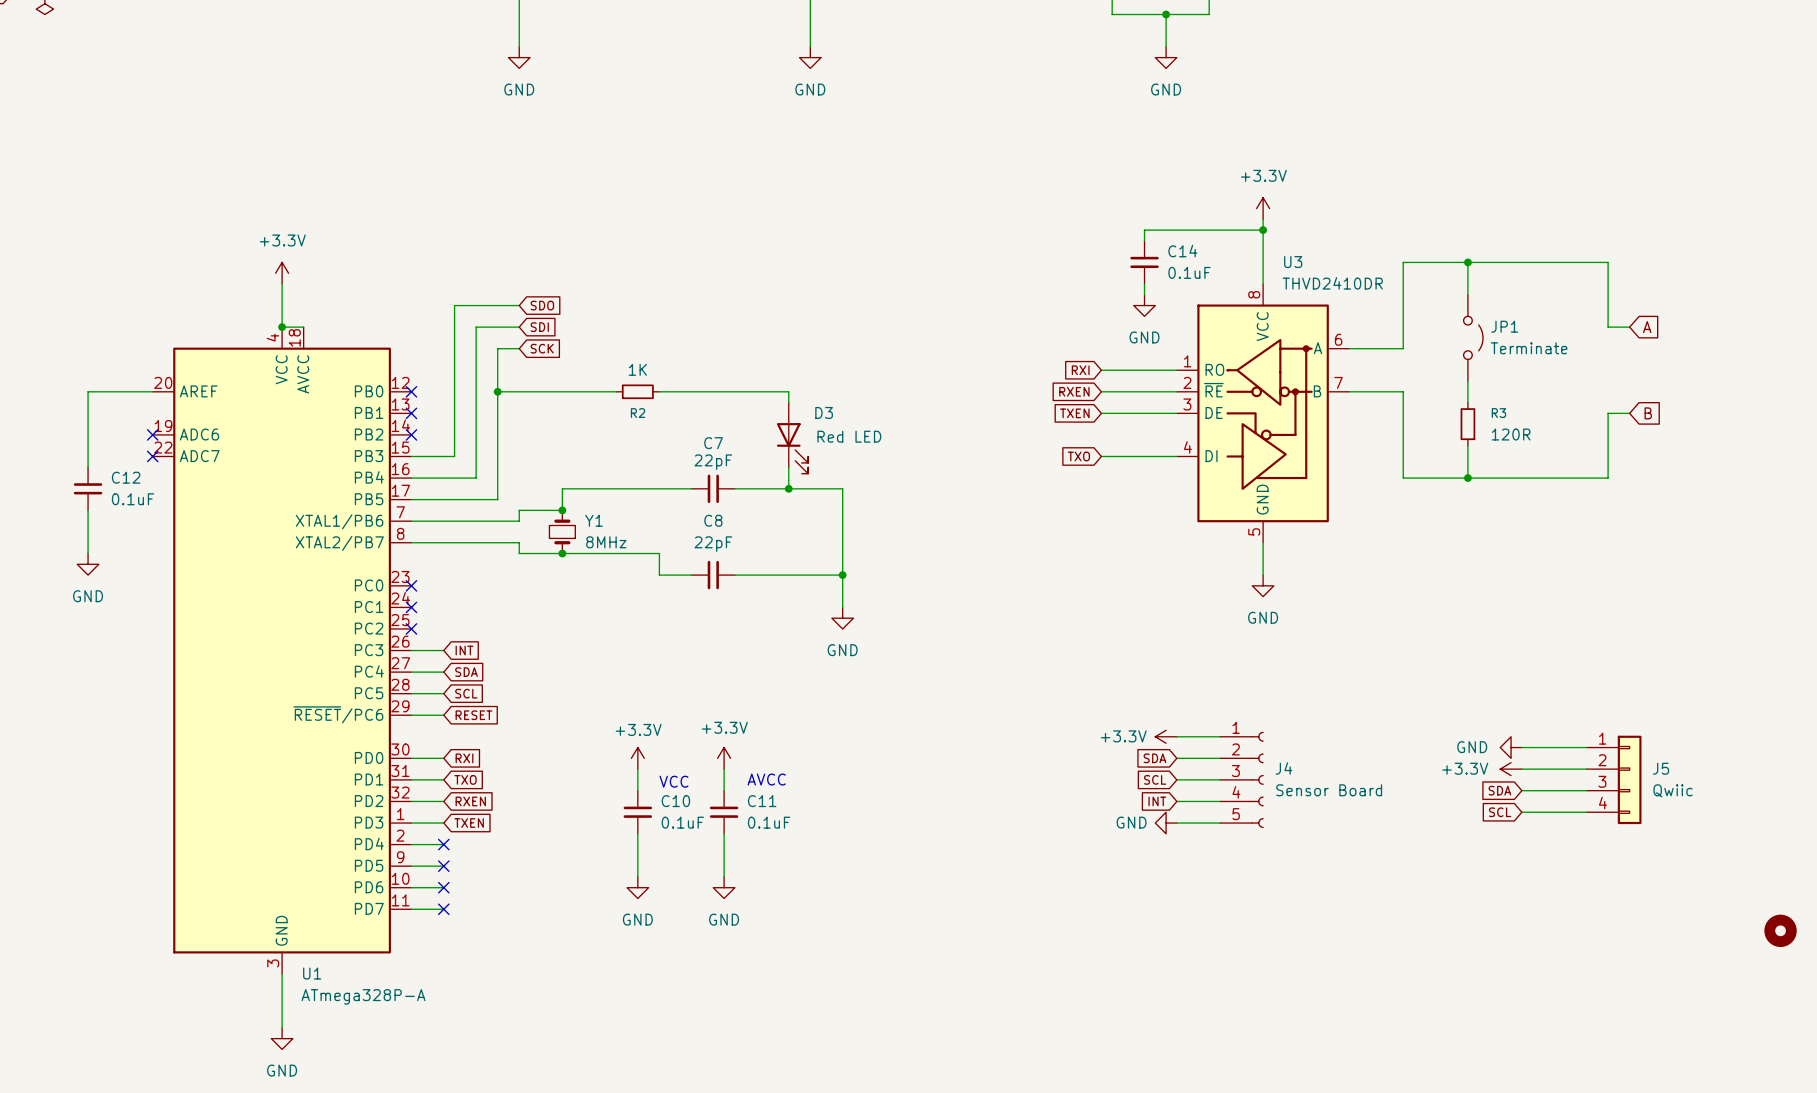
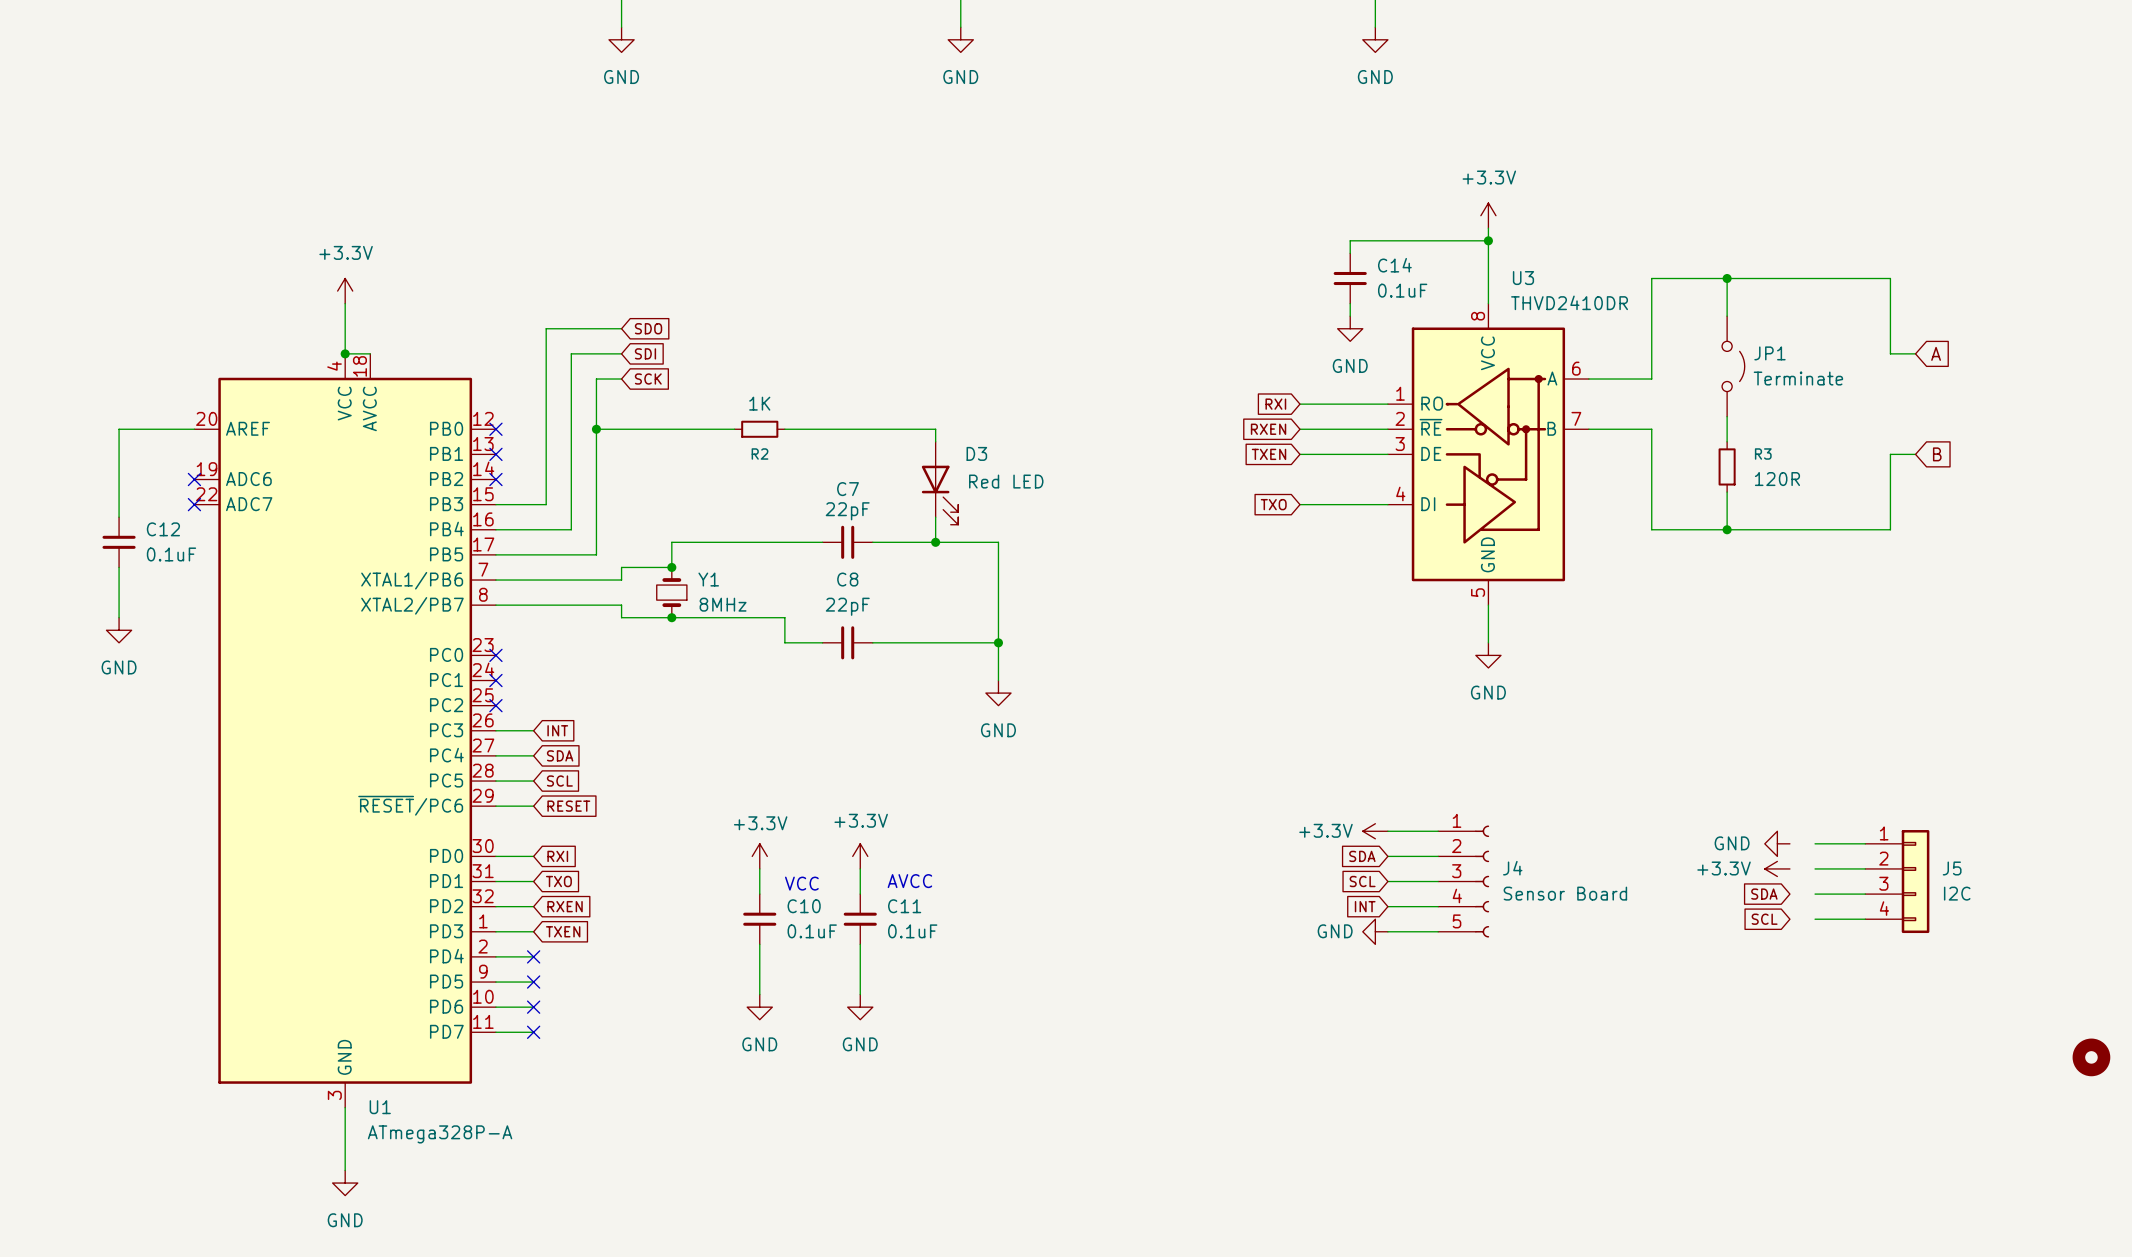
wire: (1521, 747) (1543, 747) -> none
wire: (1521, 769) (1543, 769) -> none
wire: (1521, 790) (1543, 790) -> none
J5 value: Qwiic (1673, 790) -> I2C (1957, 893)
wire: (1521, 812) (1543, 812) -> none

